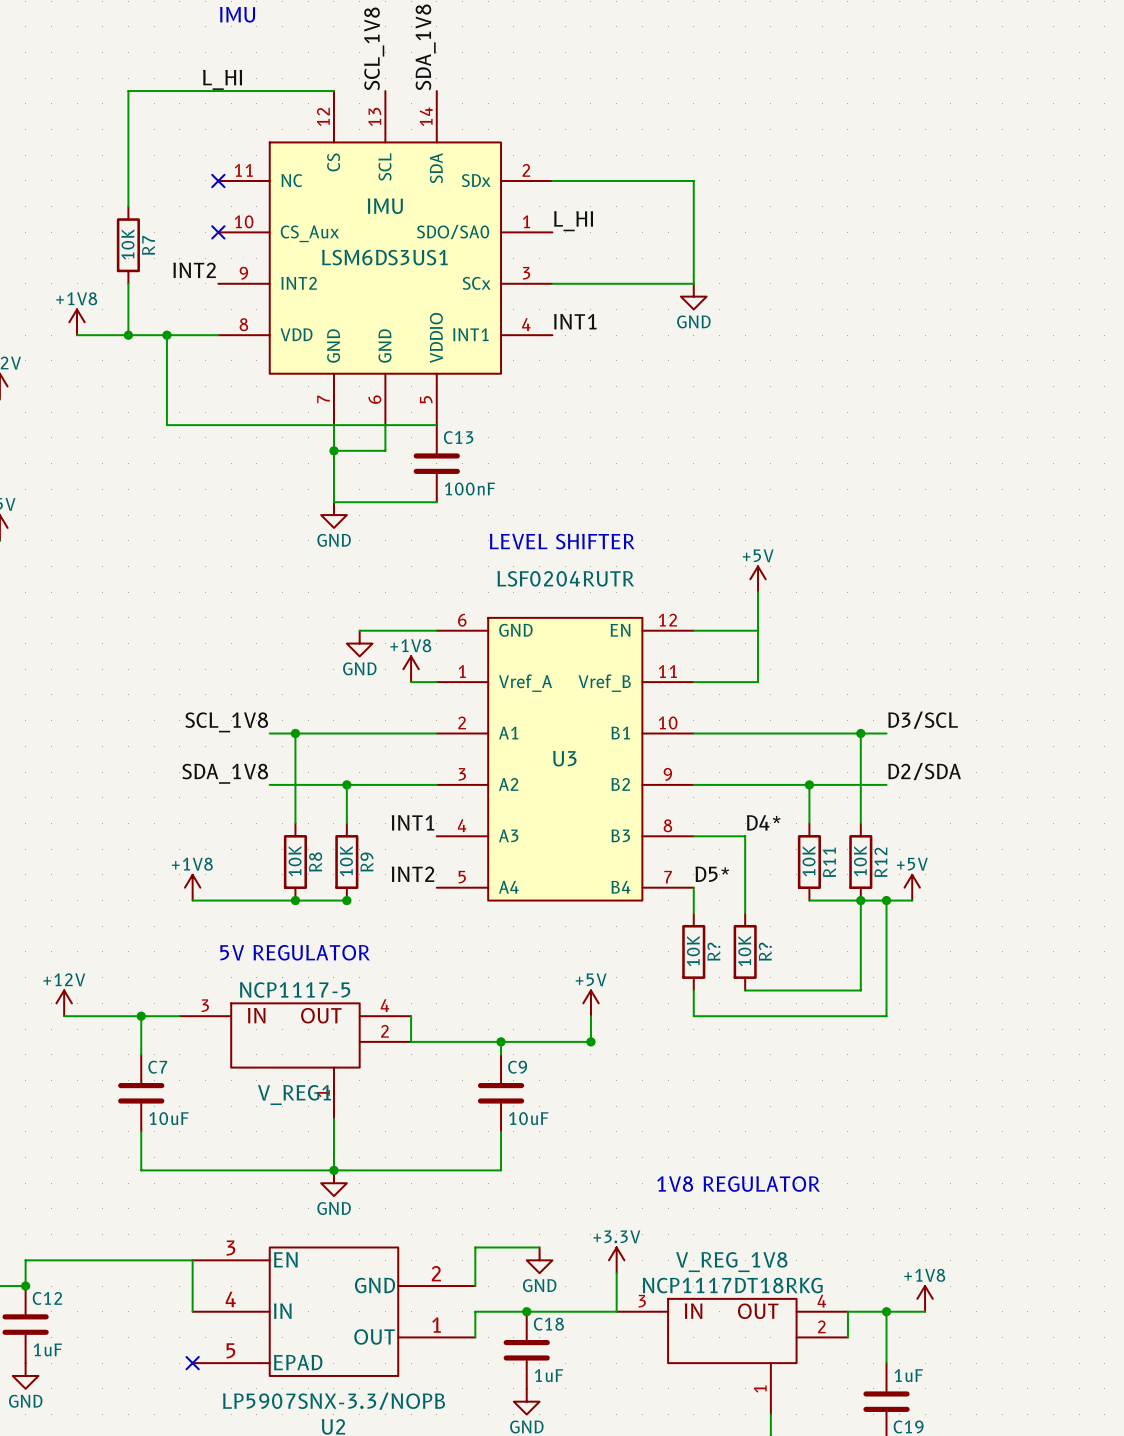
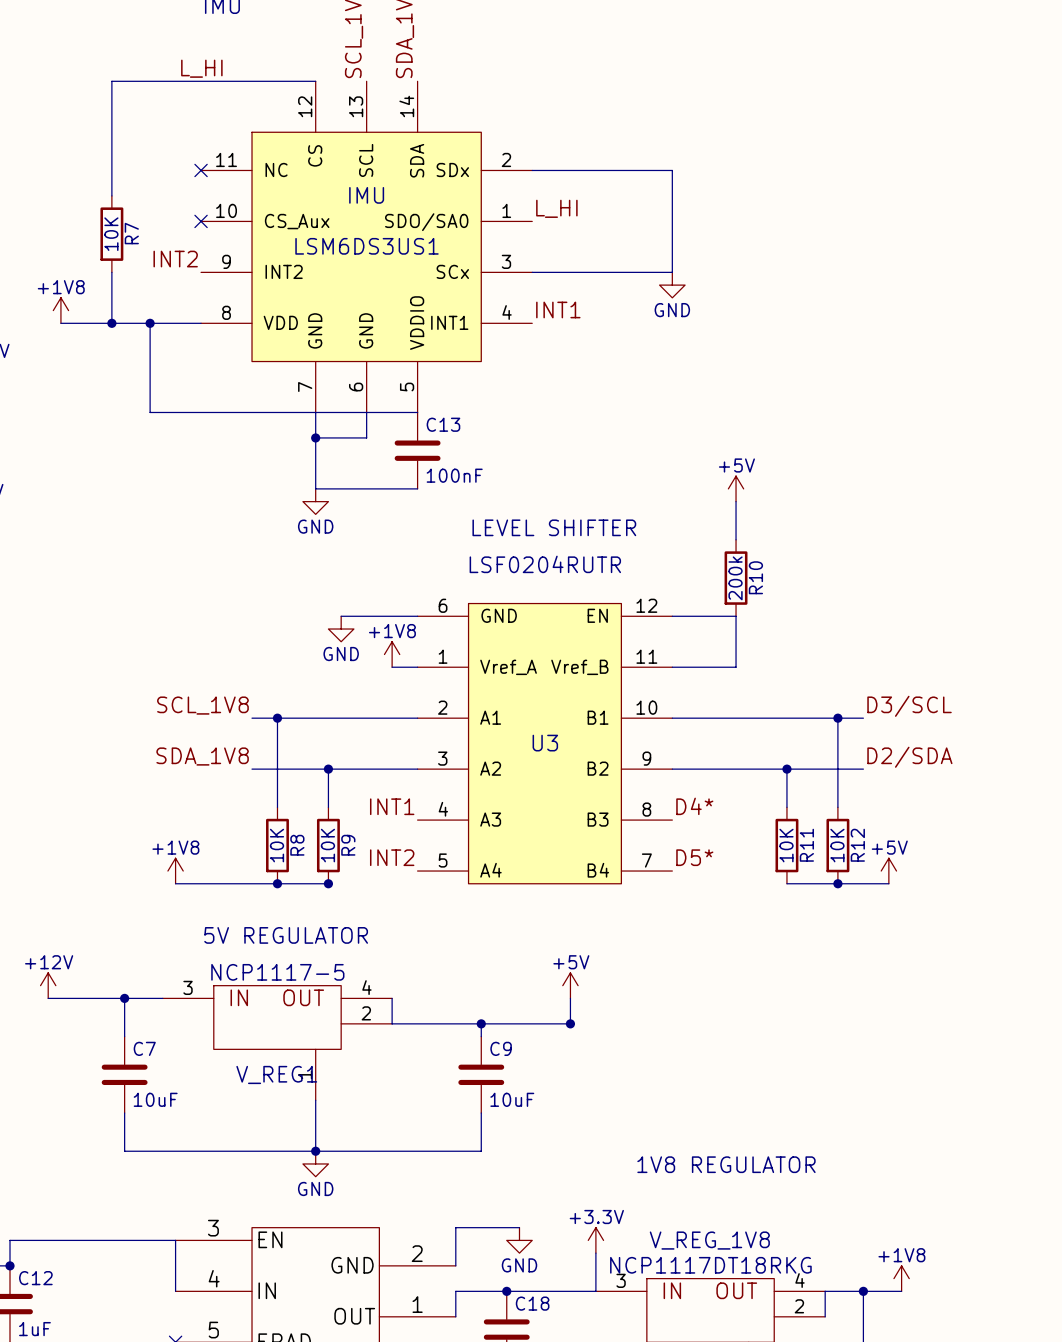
power symbol position: +5V (758, 579) -> +5V (736, 488)
wire: (758, 592) (758, 630) -> (736, 501) (736, 539)
R10: none -> 200k (736, 578)
label position: D4* (763, 822) -> D4* (694, 806)
wire: (693, 836) (745, 836) (745, 913) -> none
wire: (693, 887) (693, 913) -> none
wire: (860, 900) (860, 990) (745, 990) -> none
wire: (886, 900) (886, 1016) (693, 1016) (693, 990) -> none
junction: (886, 900) -> none
R?: 10K (693, 951) -> none
R?: 10K (745, 951) -> none

